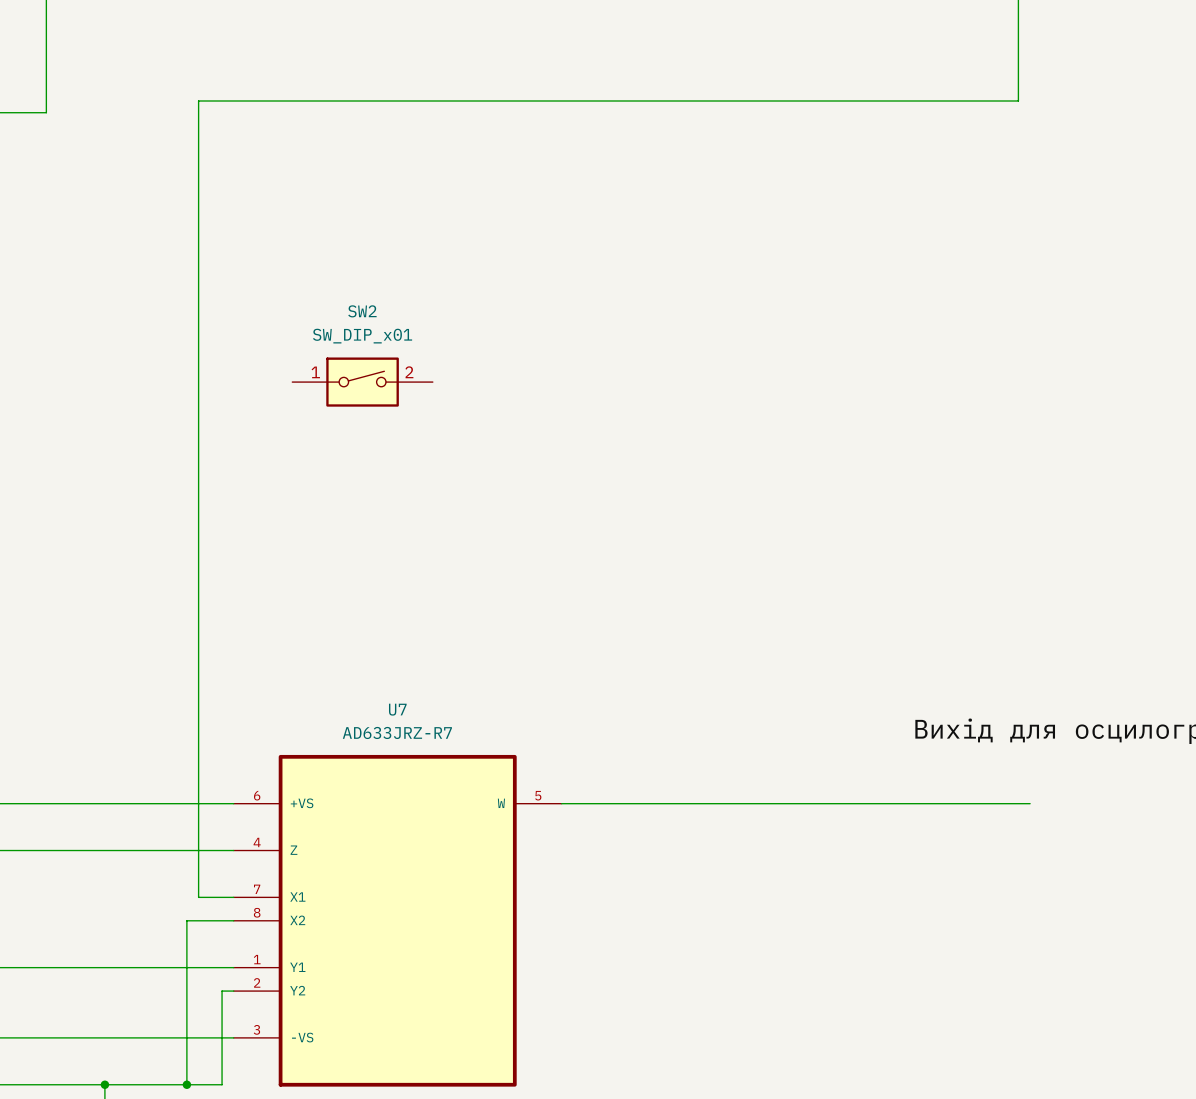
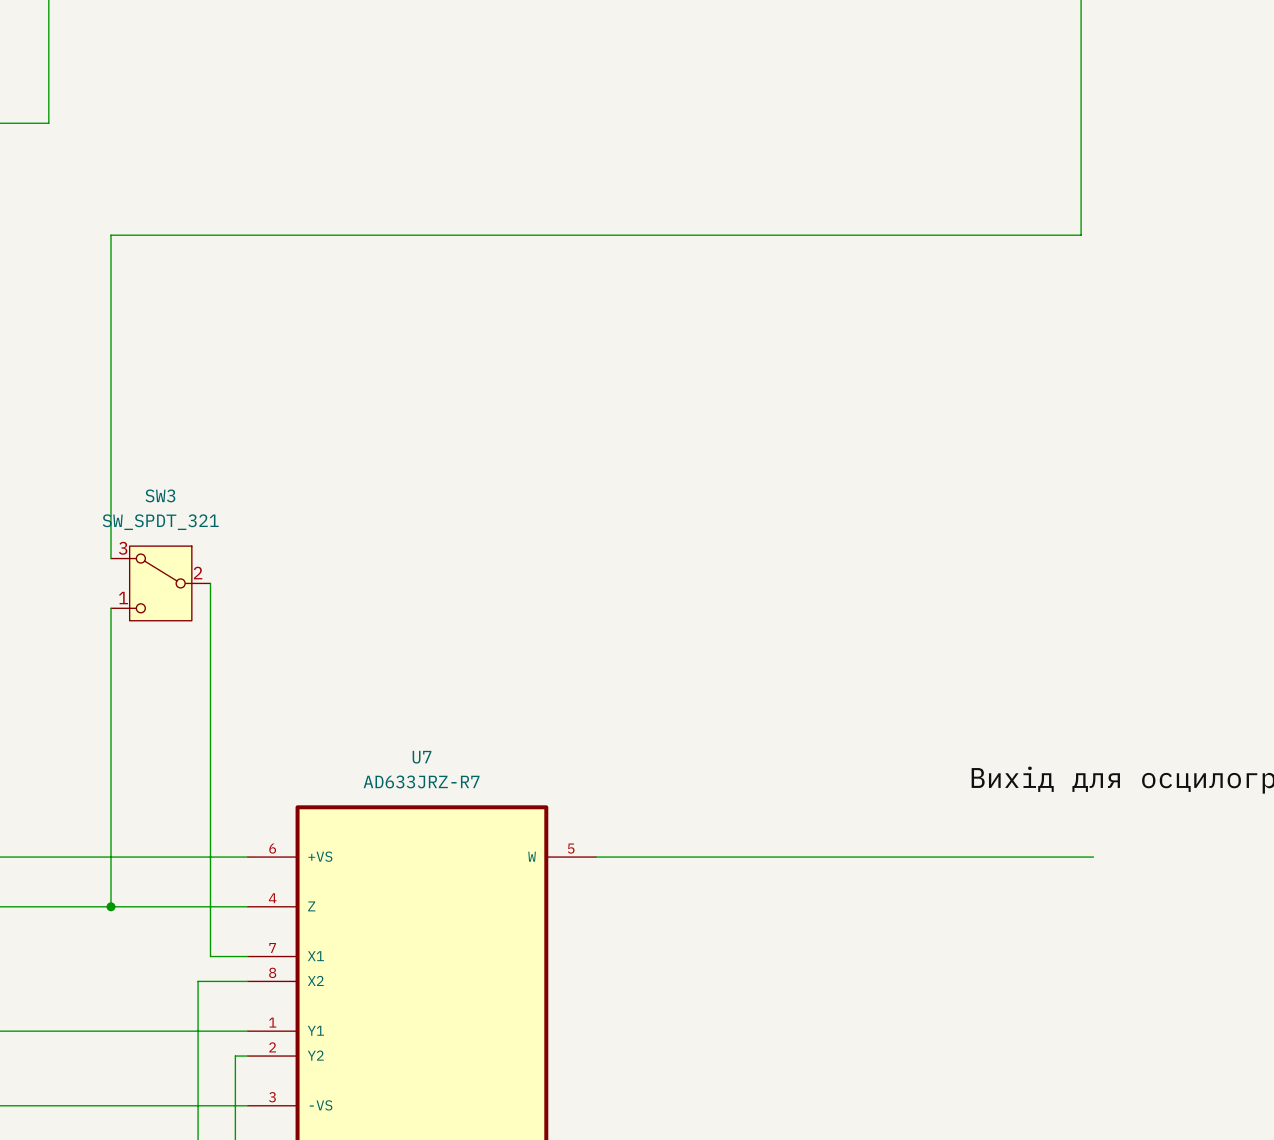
wire: (1018, 100) (198, 100) (198, 546) -> (1081, 110) (1081, 235) (110, 235) (110, 558)
SW2: SW_DIP_x01 (362, 382) -> none
SW3: none -> SW_SPDT_321 (160, 583)
wire: none -> (110, 608) (110, 906)
junction: none -> (110, 906)

